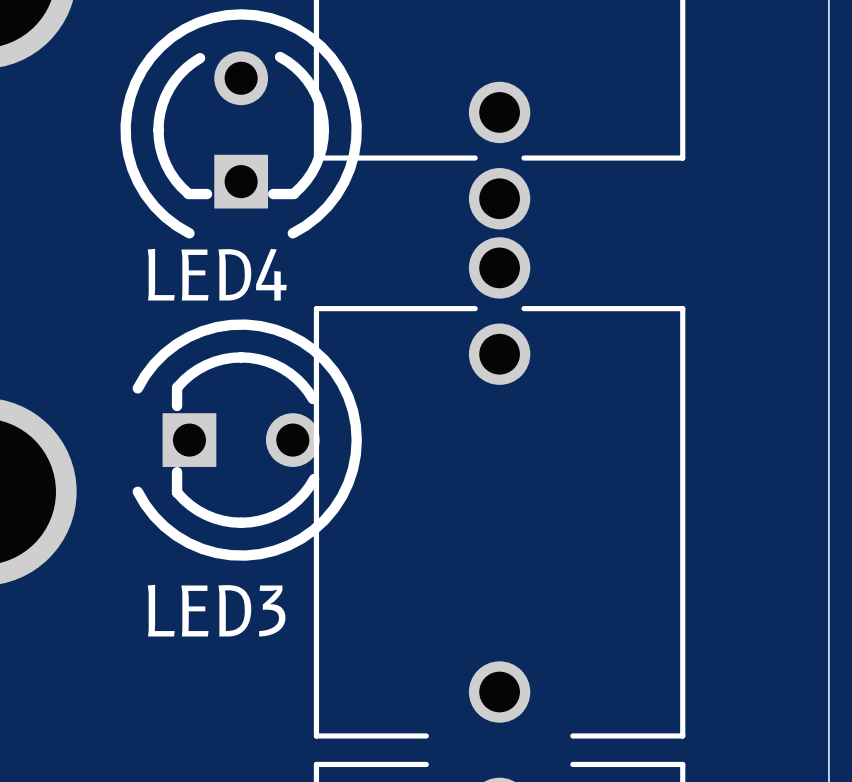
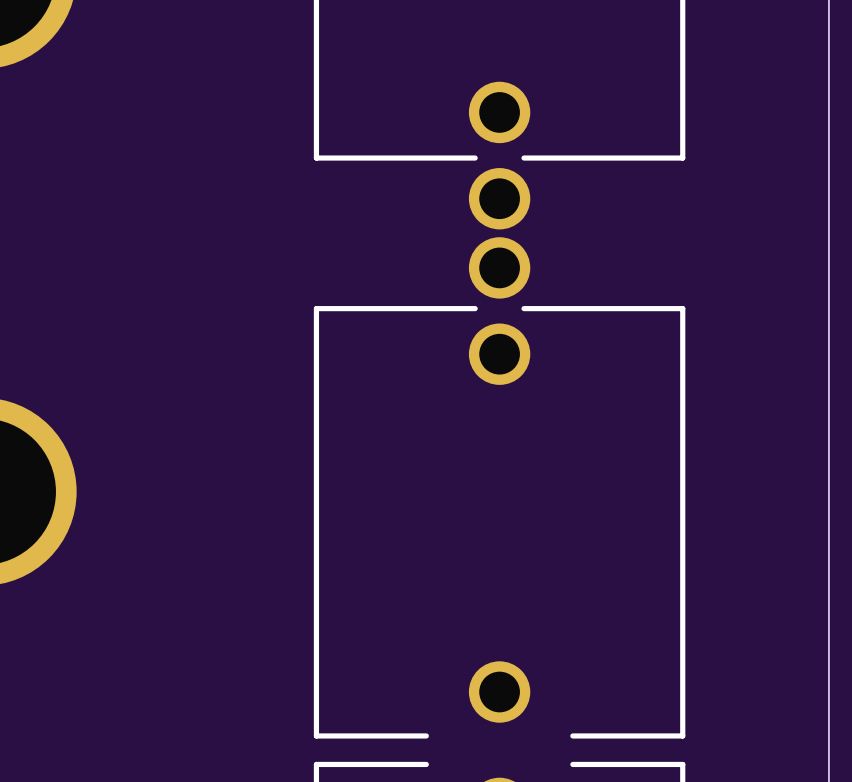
LED4: (241, 123) -> none
LED3: (247, 440) -> none

